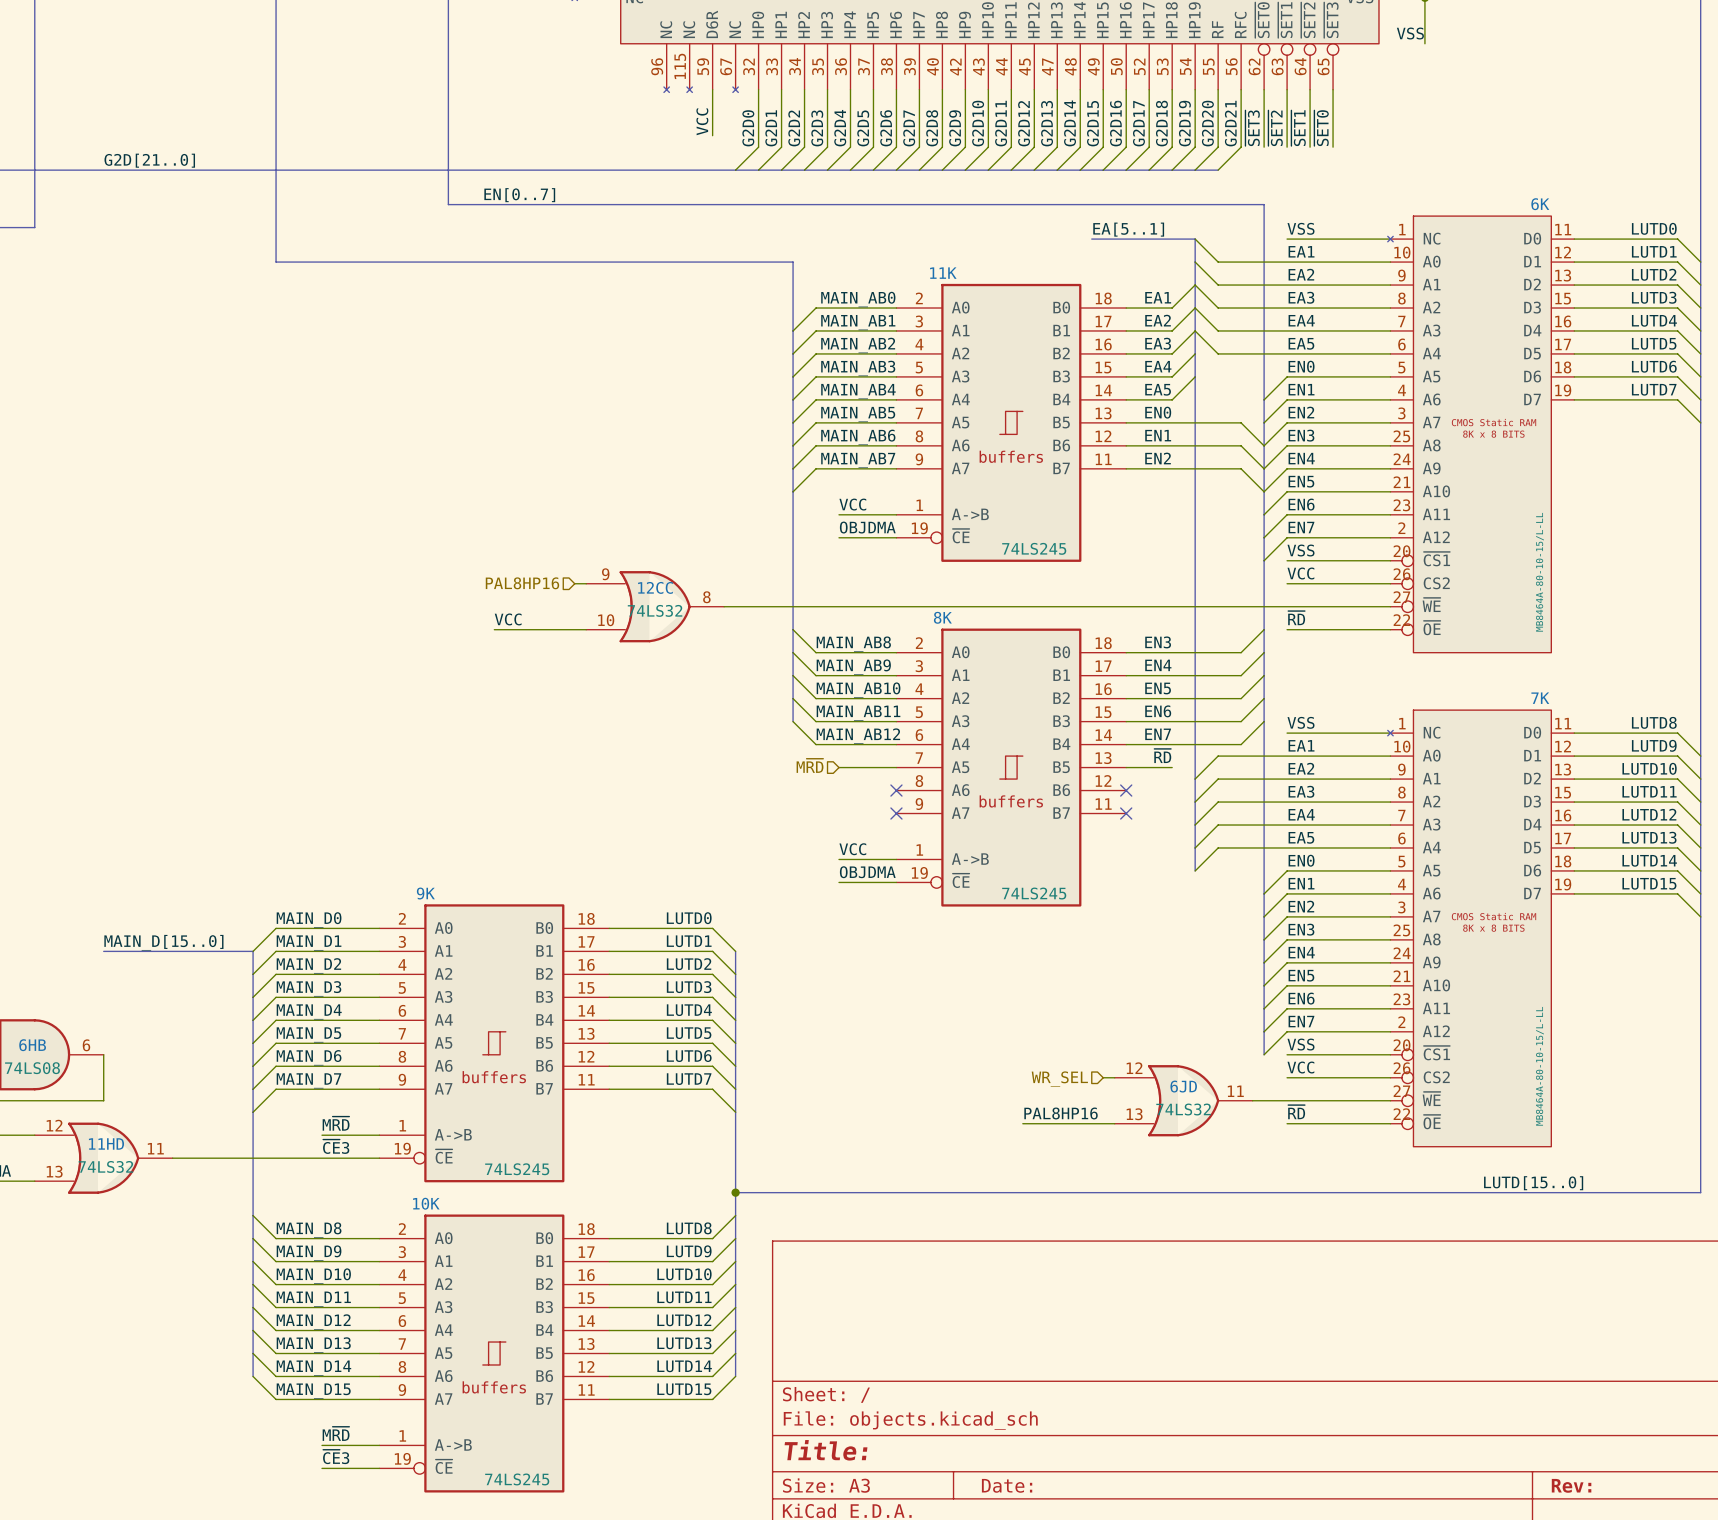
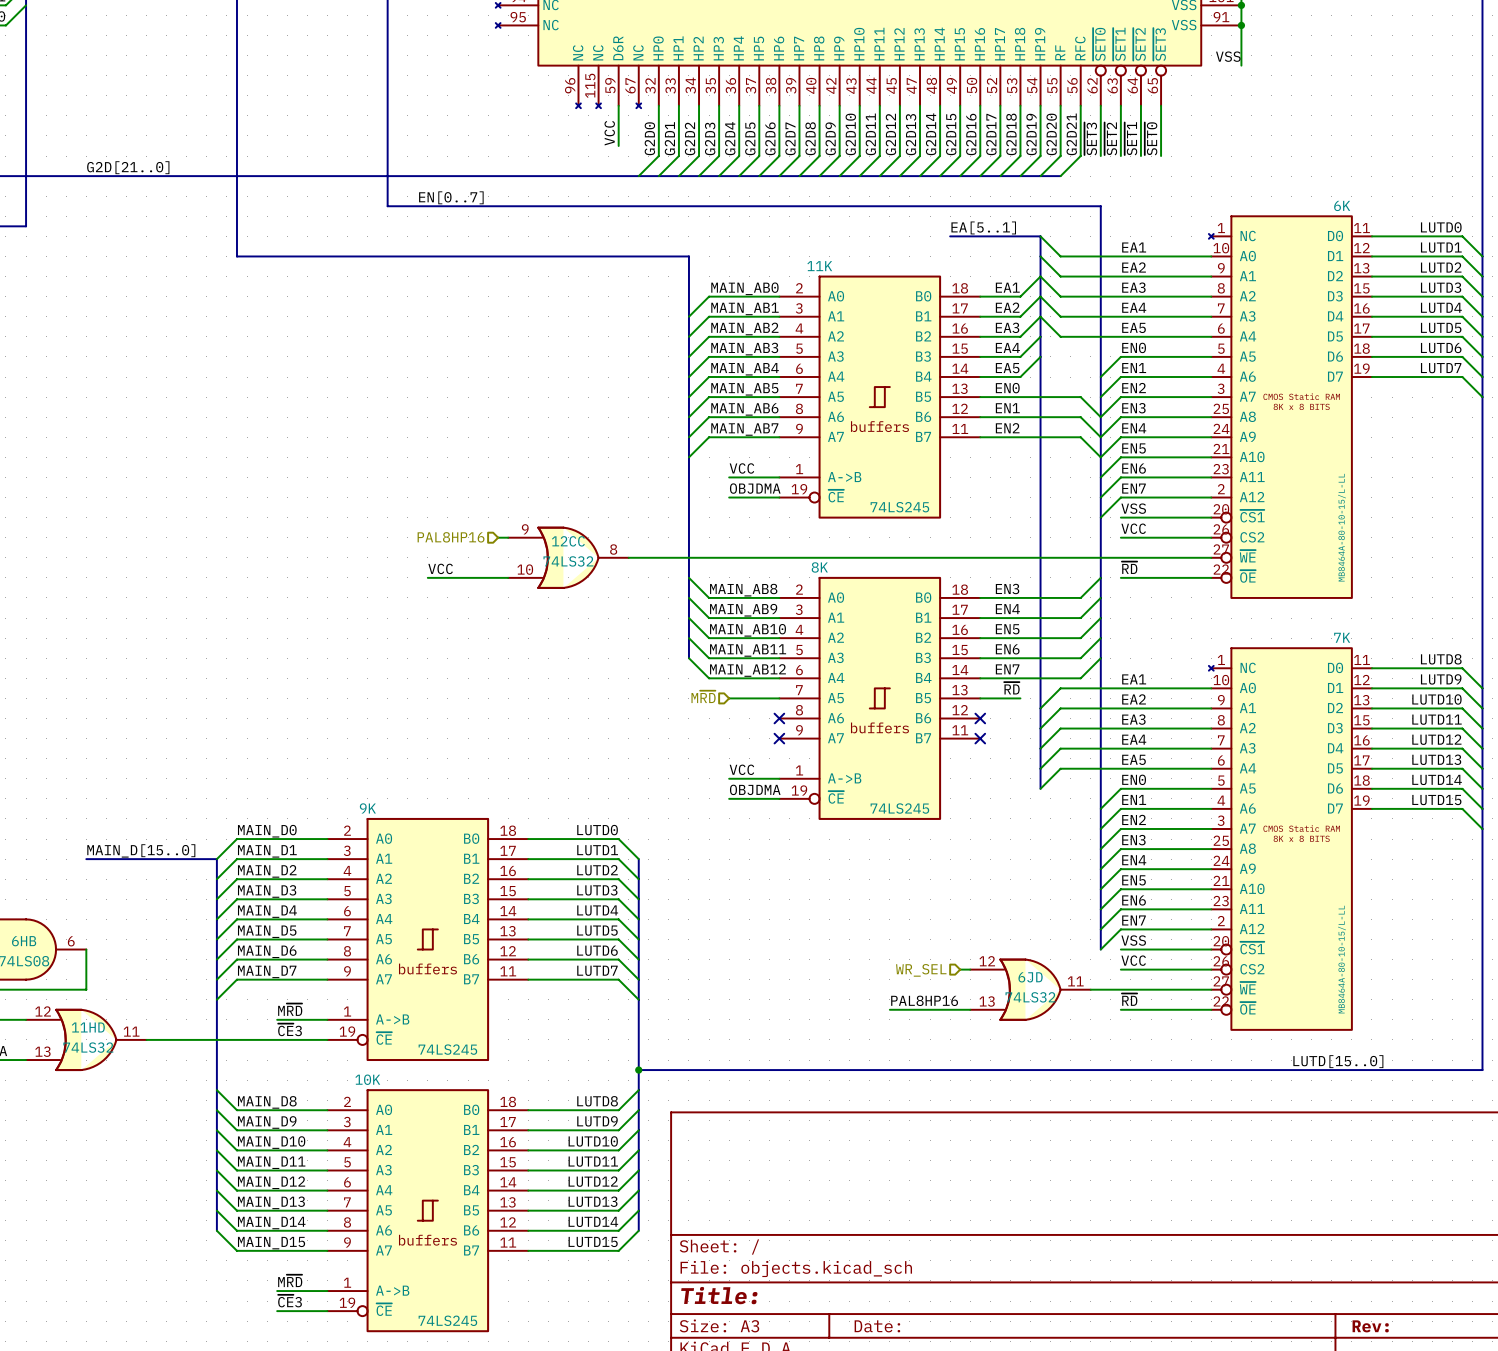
label: VSS (1301, 228) -> none
wire: (1287, 239) (1390, 239) -> none
label: VSS (1301, 722) -> none
wire: (1287, 733) (1390, 733) -> none

